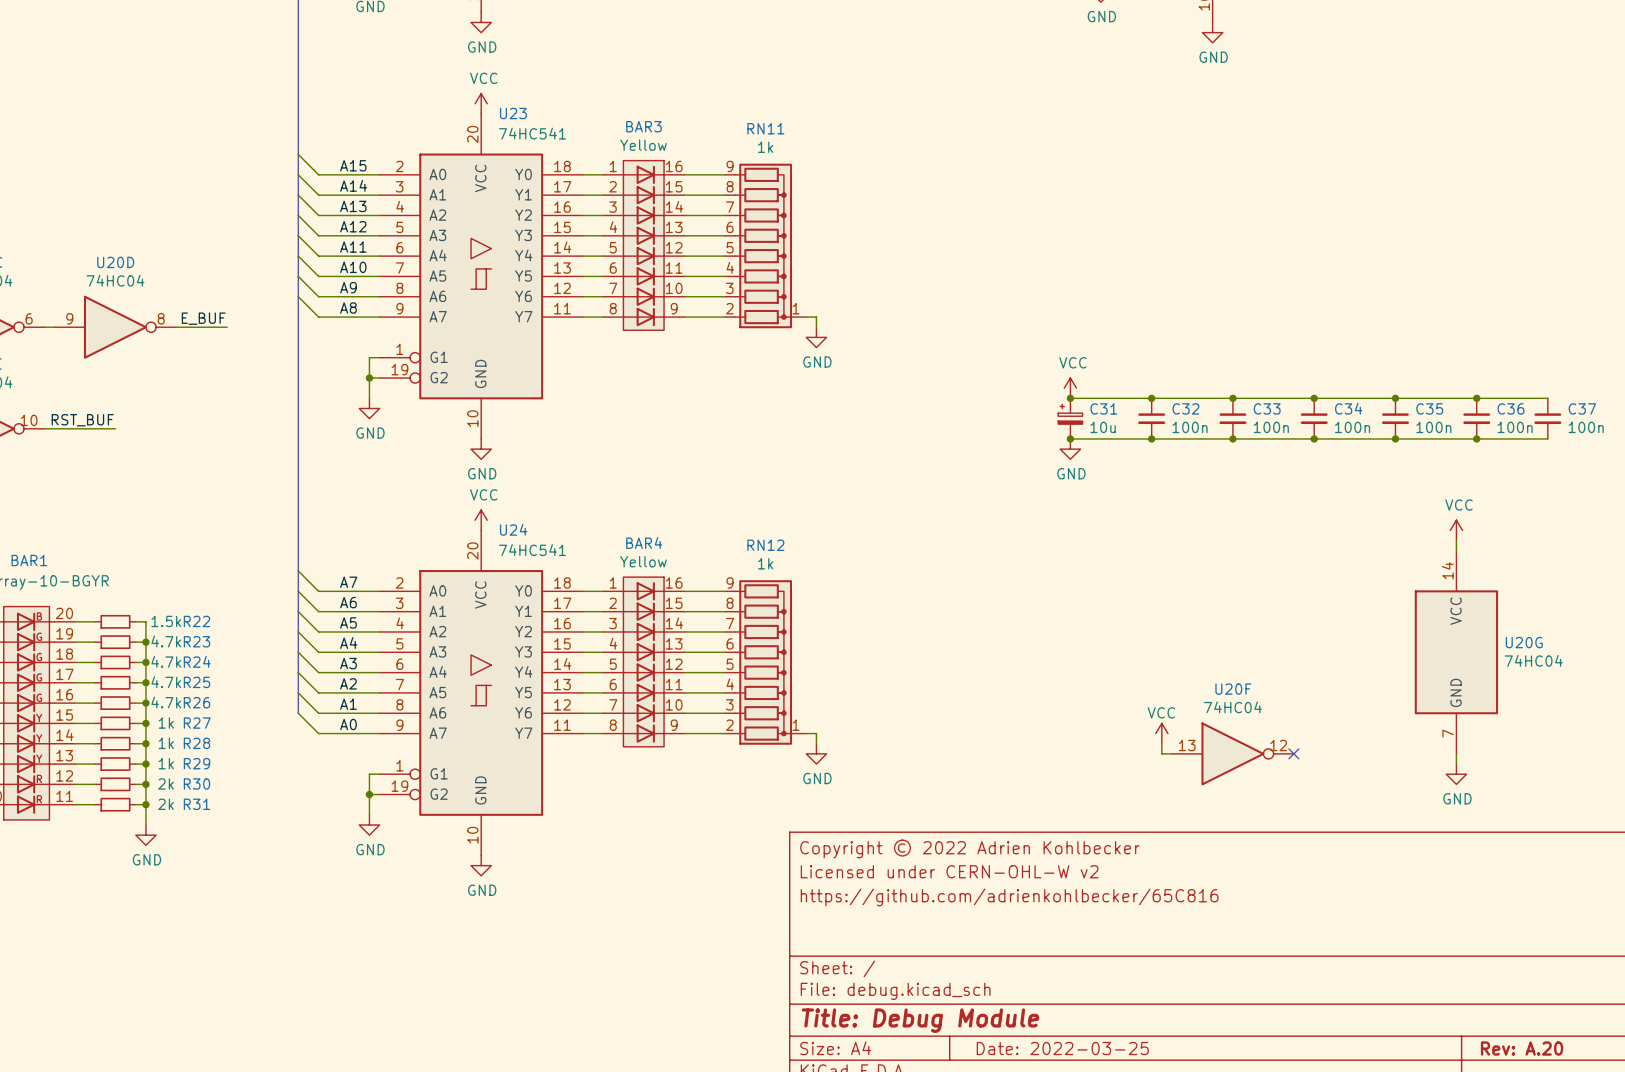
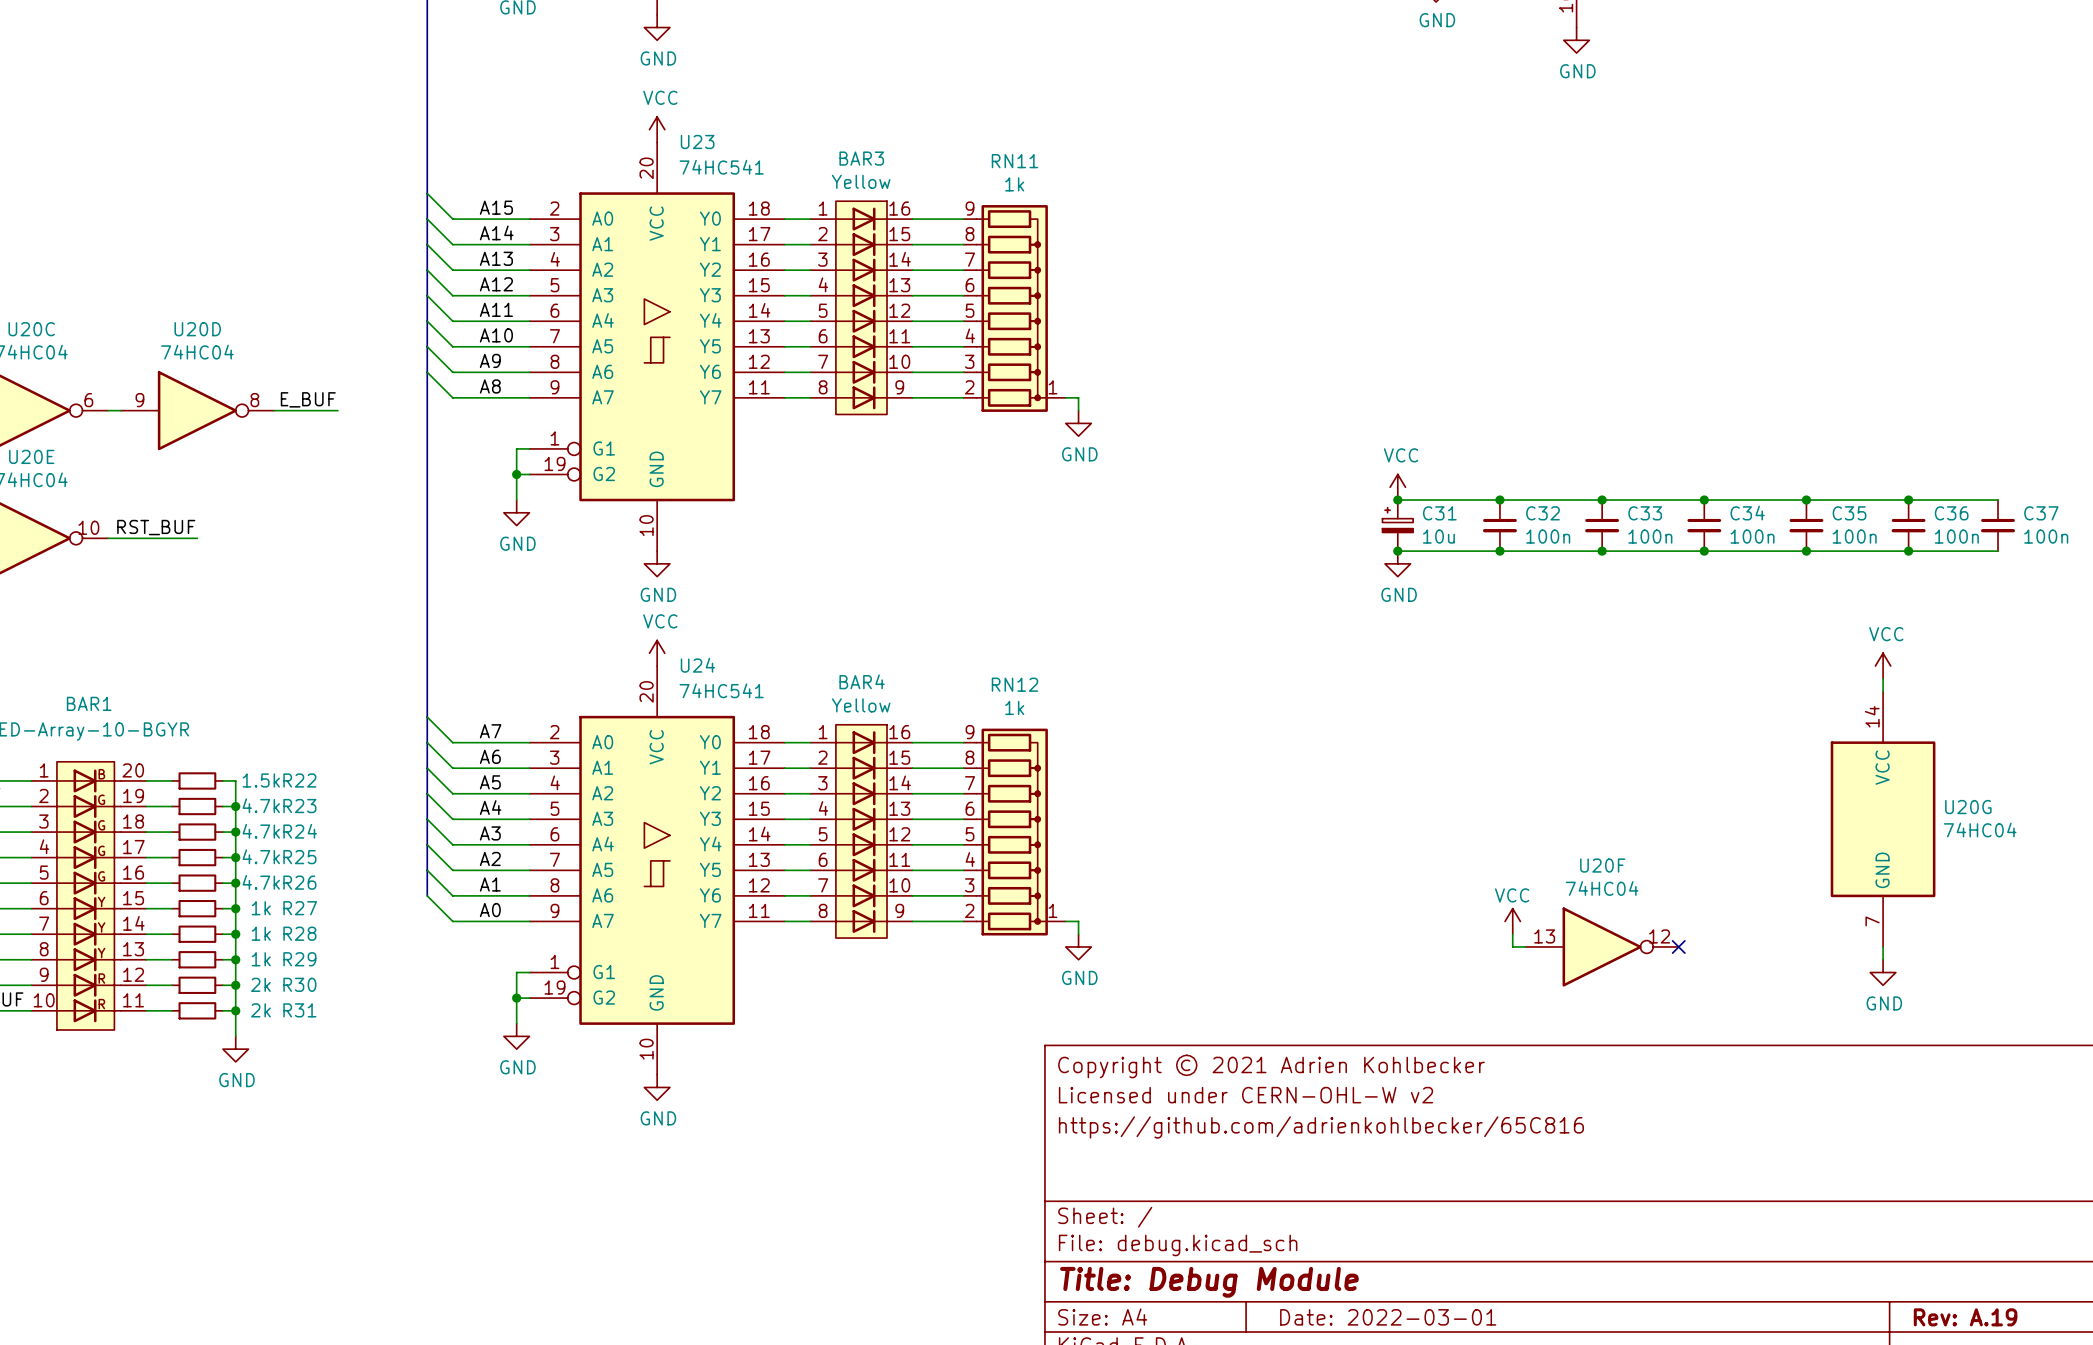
title block: Copyright © 2022 Adrien Kohlbecker (969, 848) -> Copyright © 2021 Adrien Kohlbecker (1271, 1066)
title block: Date: 2022-03-25 (1062, 1048) -> Date: 2022-03-01 (1388, 1317)
title block: Rev: A.20 (1522, 1048) -> Rev: A.19 (1965, 1317)

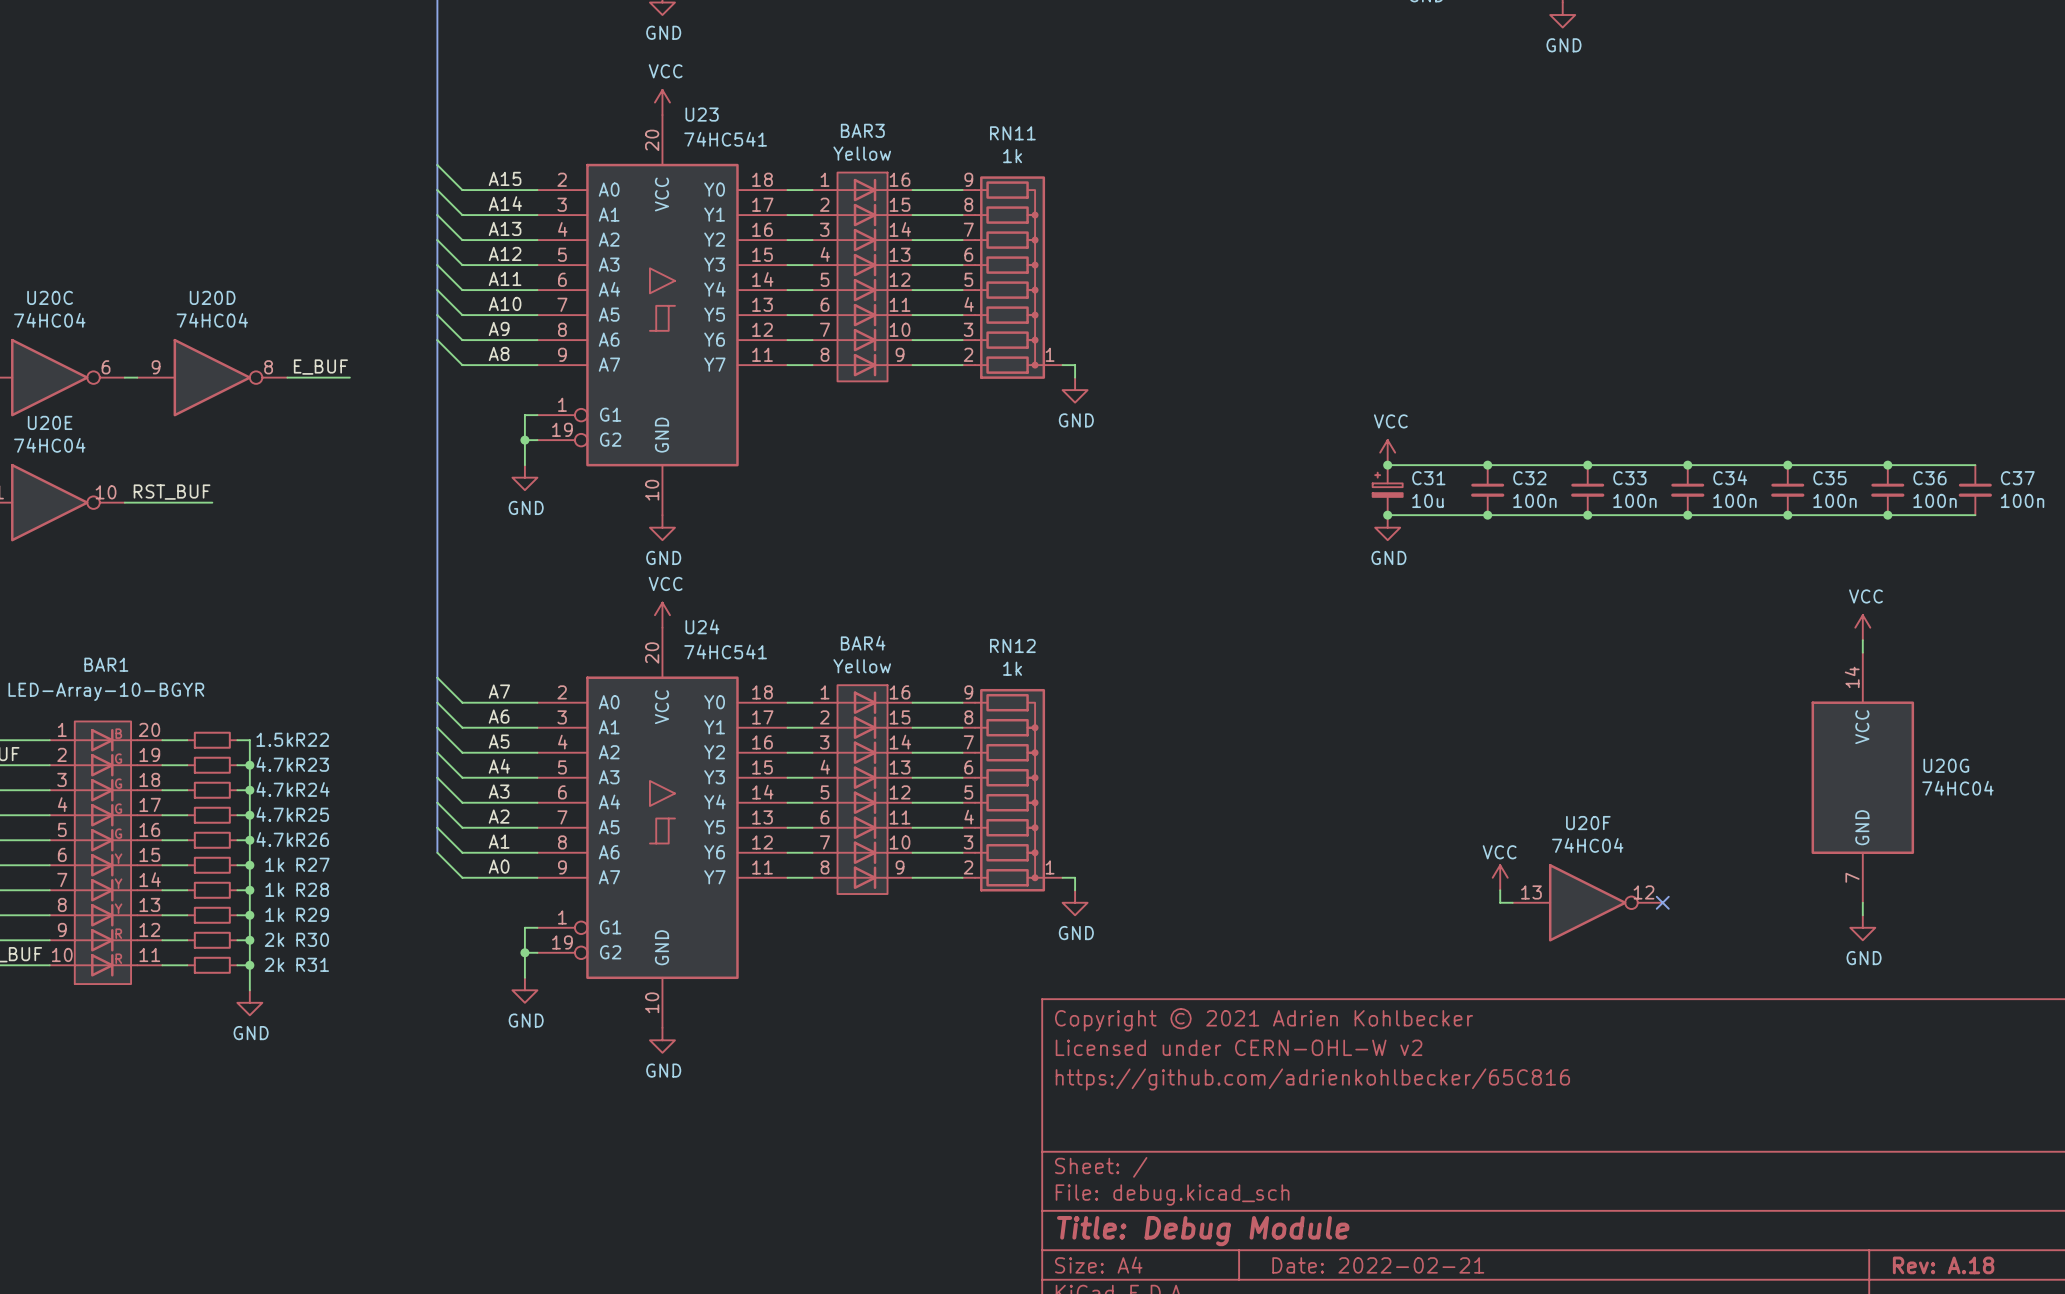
title block: Date: 2022-03-01 (1388, 1317) -> Date: 2022-02-21 (1378, 1265)
title block: Rev: A.19 (1965, 1317) -> Rev: A.18 (1943, 1265)

